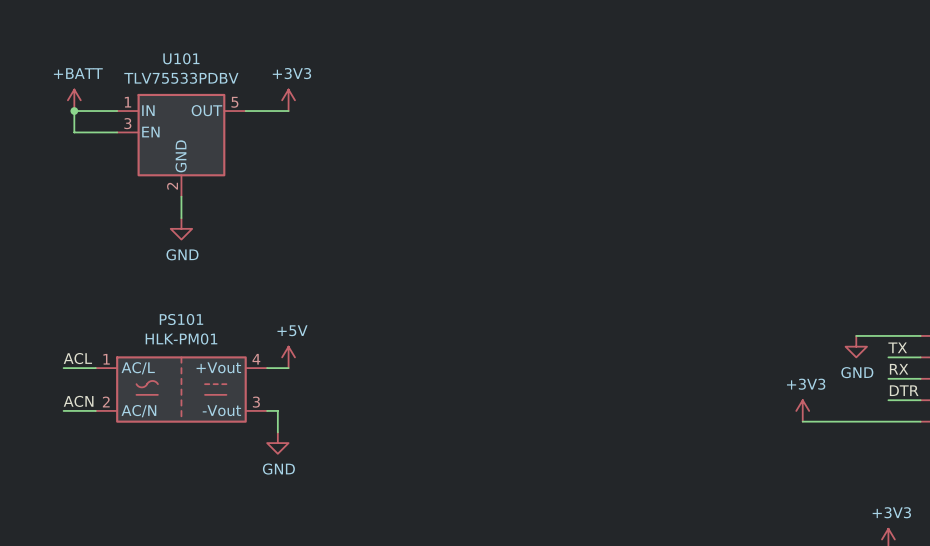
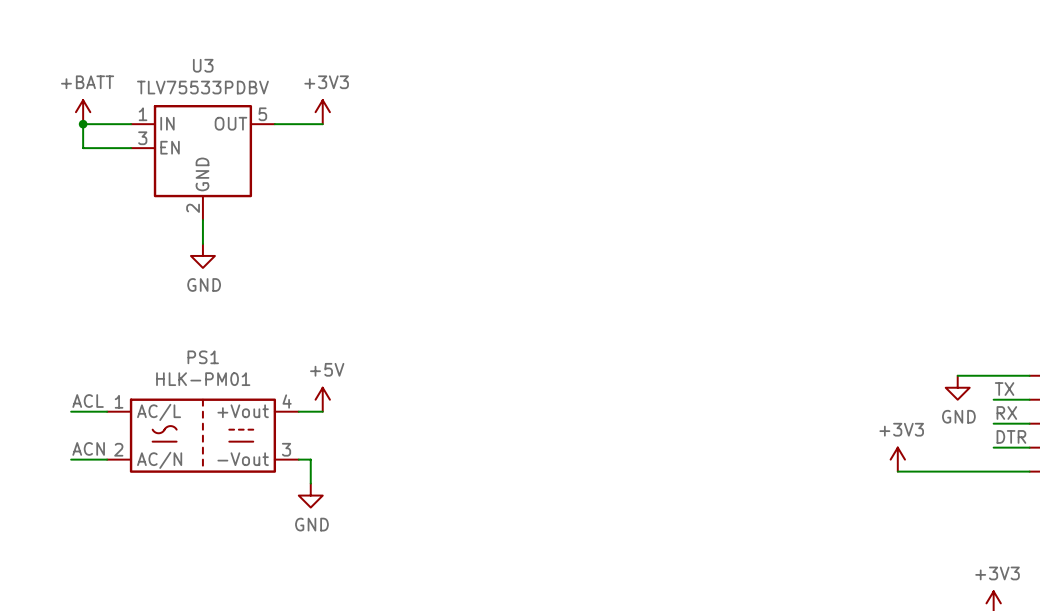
U101 name: U101 (181, 58) -> U3 (203, 65)
PS101 name: PS101 (181, 319) -> PS1 (203, 357)

